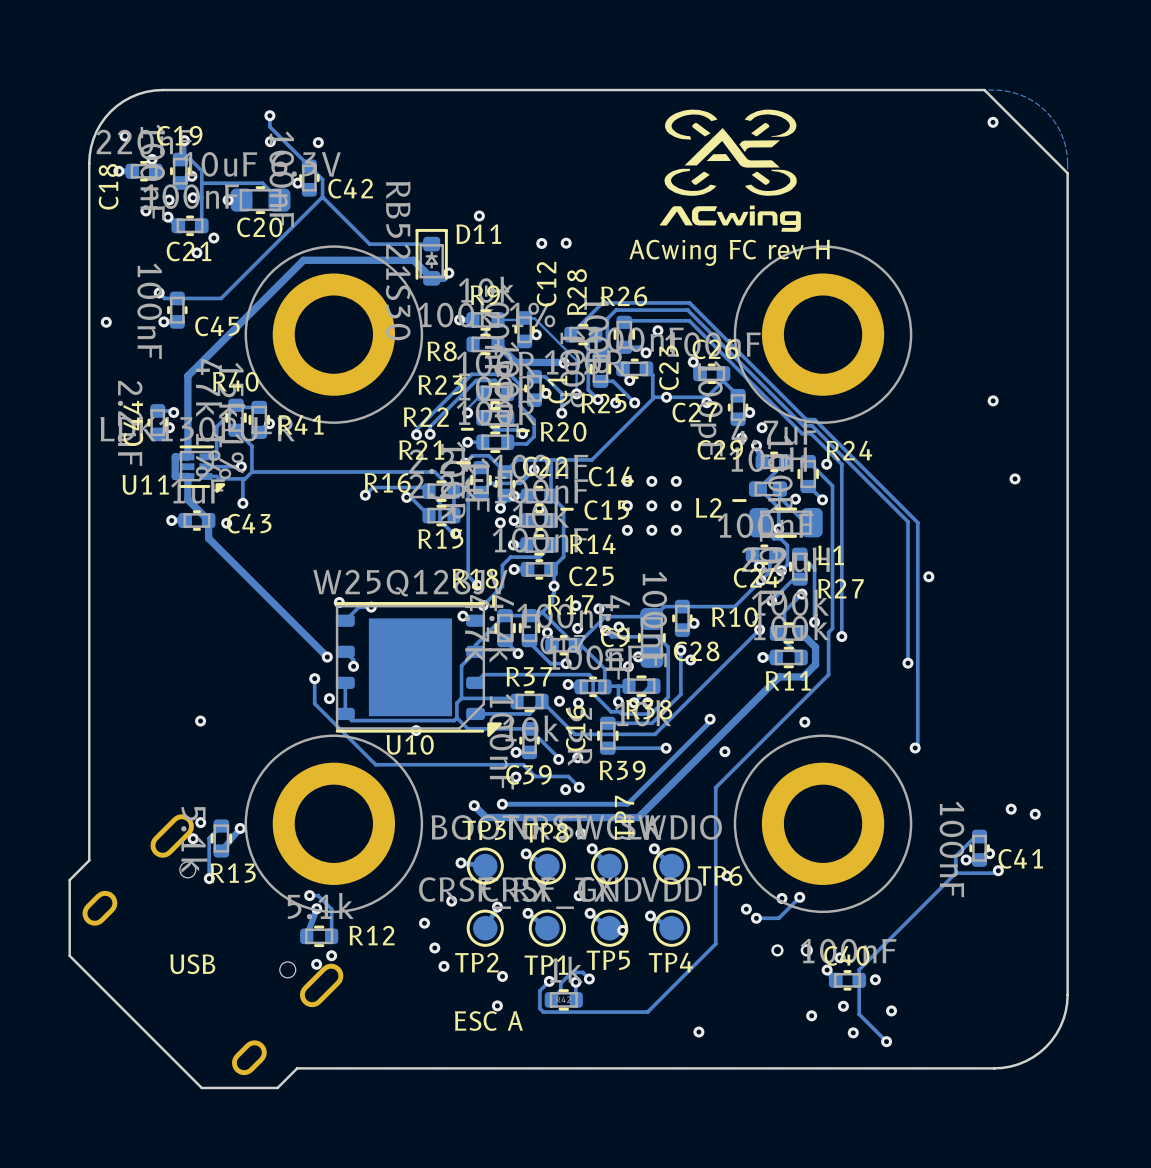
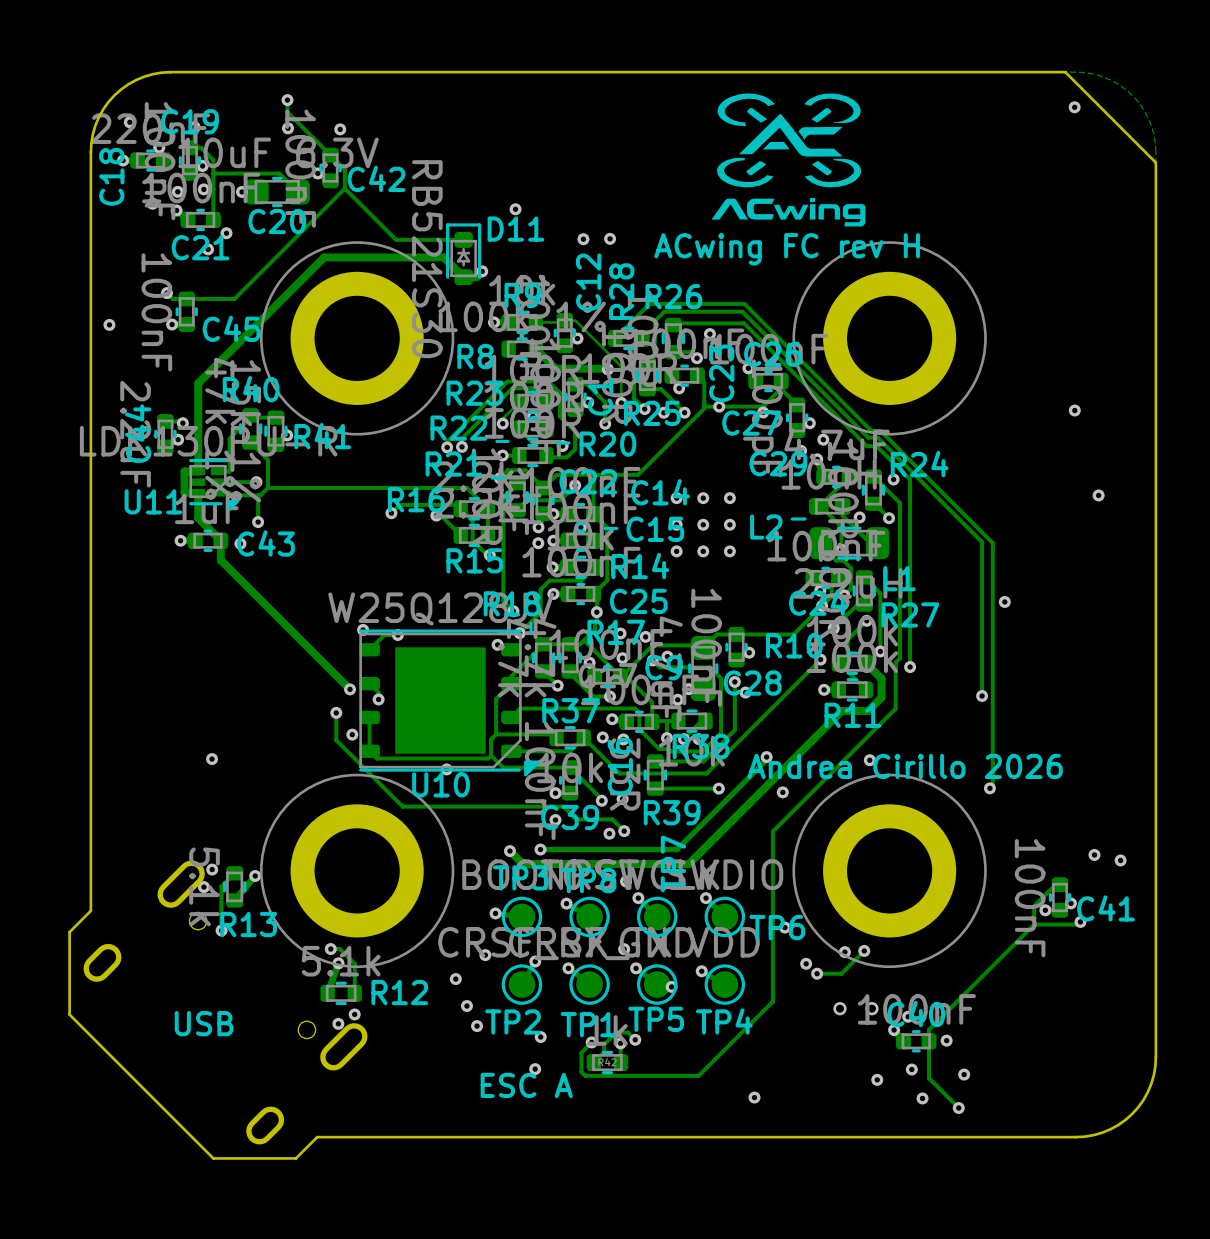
text: none -> Andrea Cirillo 2026 (905, 766)

